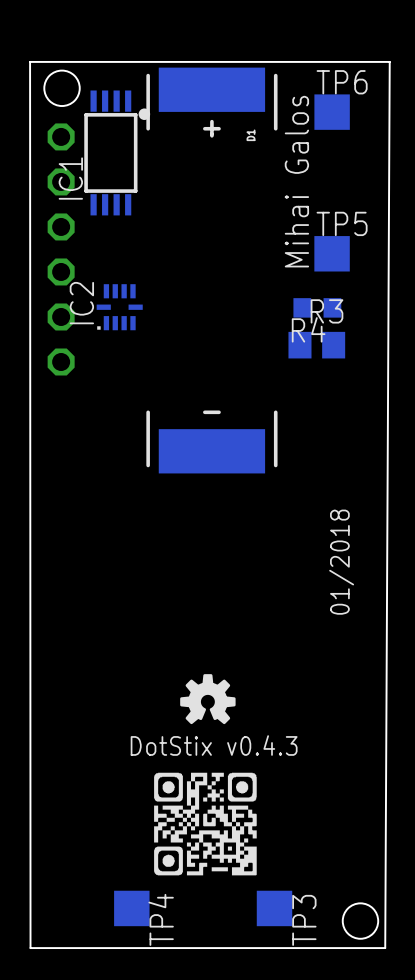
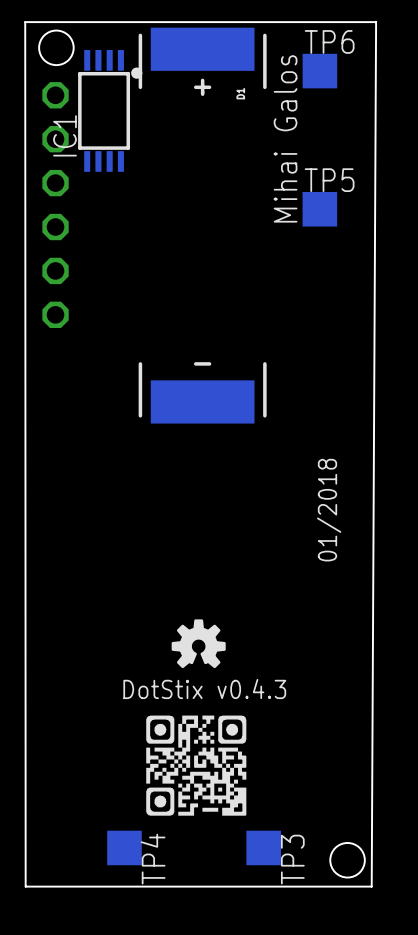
IC2: (119, 307) -> none
R4: (317, 307) -> none
R3: (316, 345) -> none

